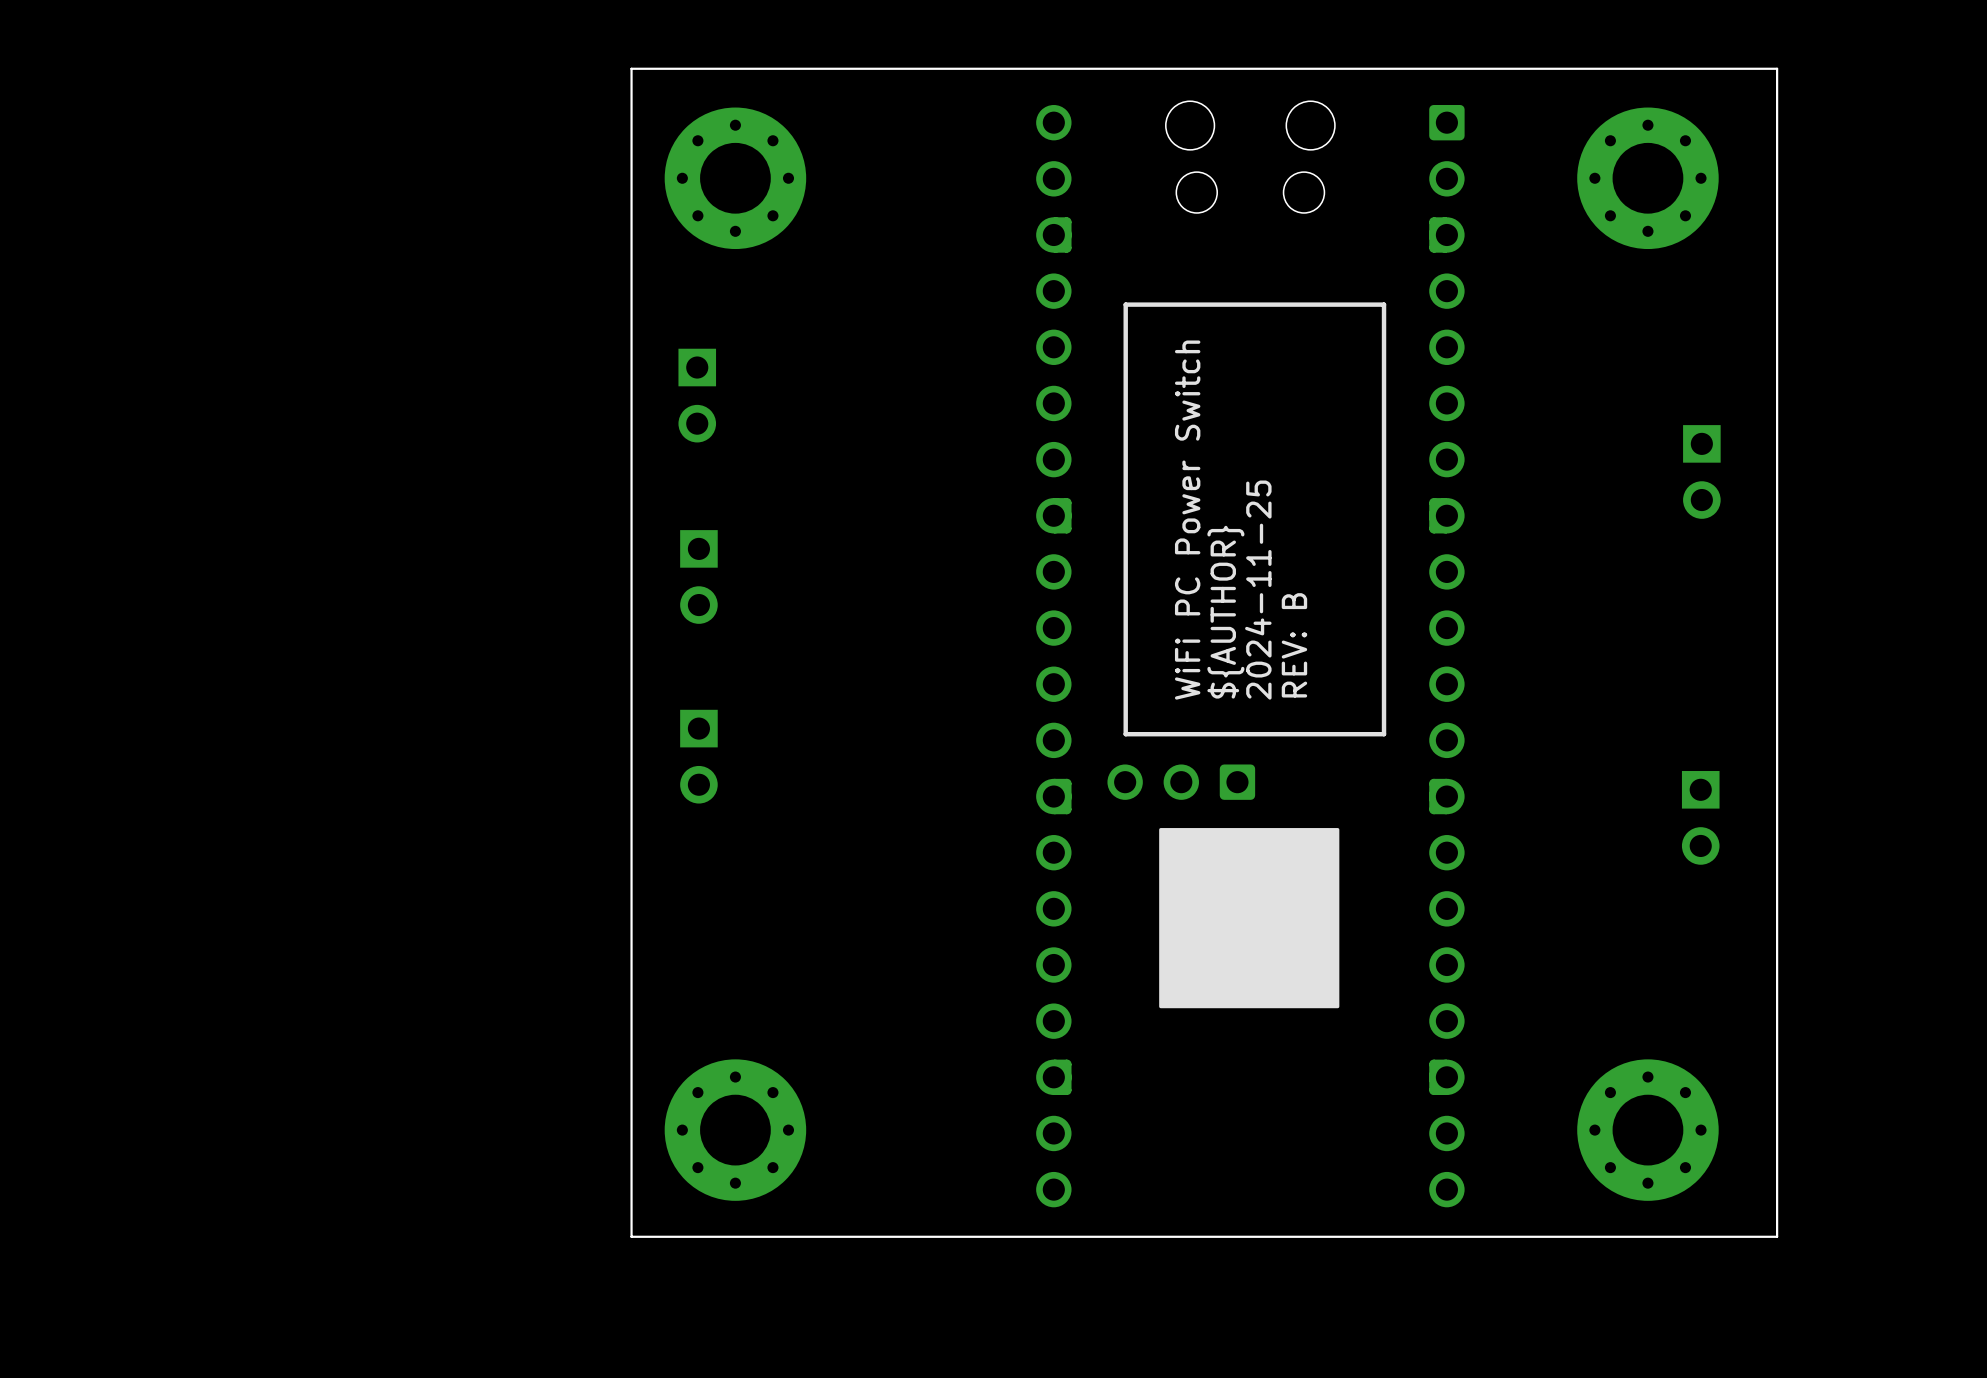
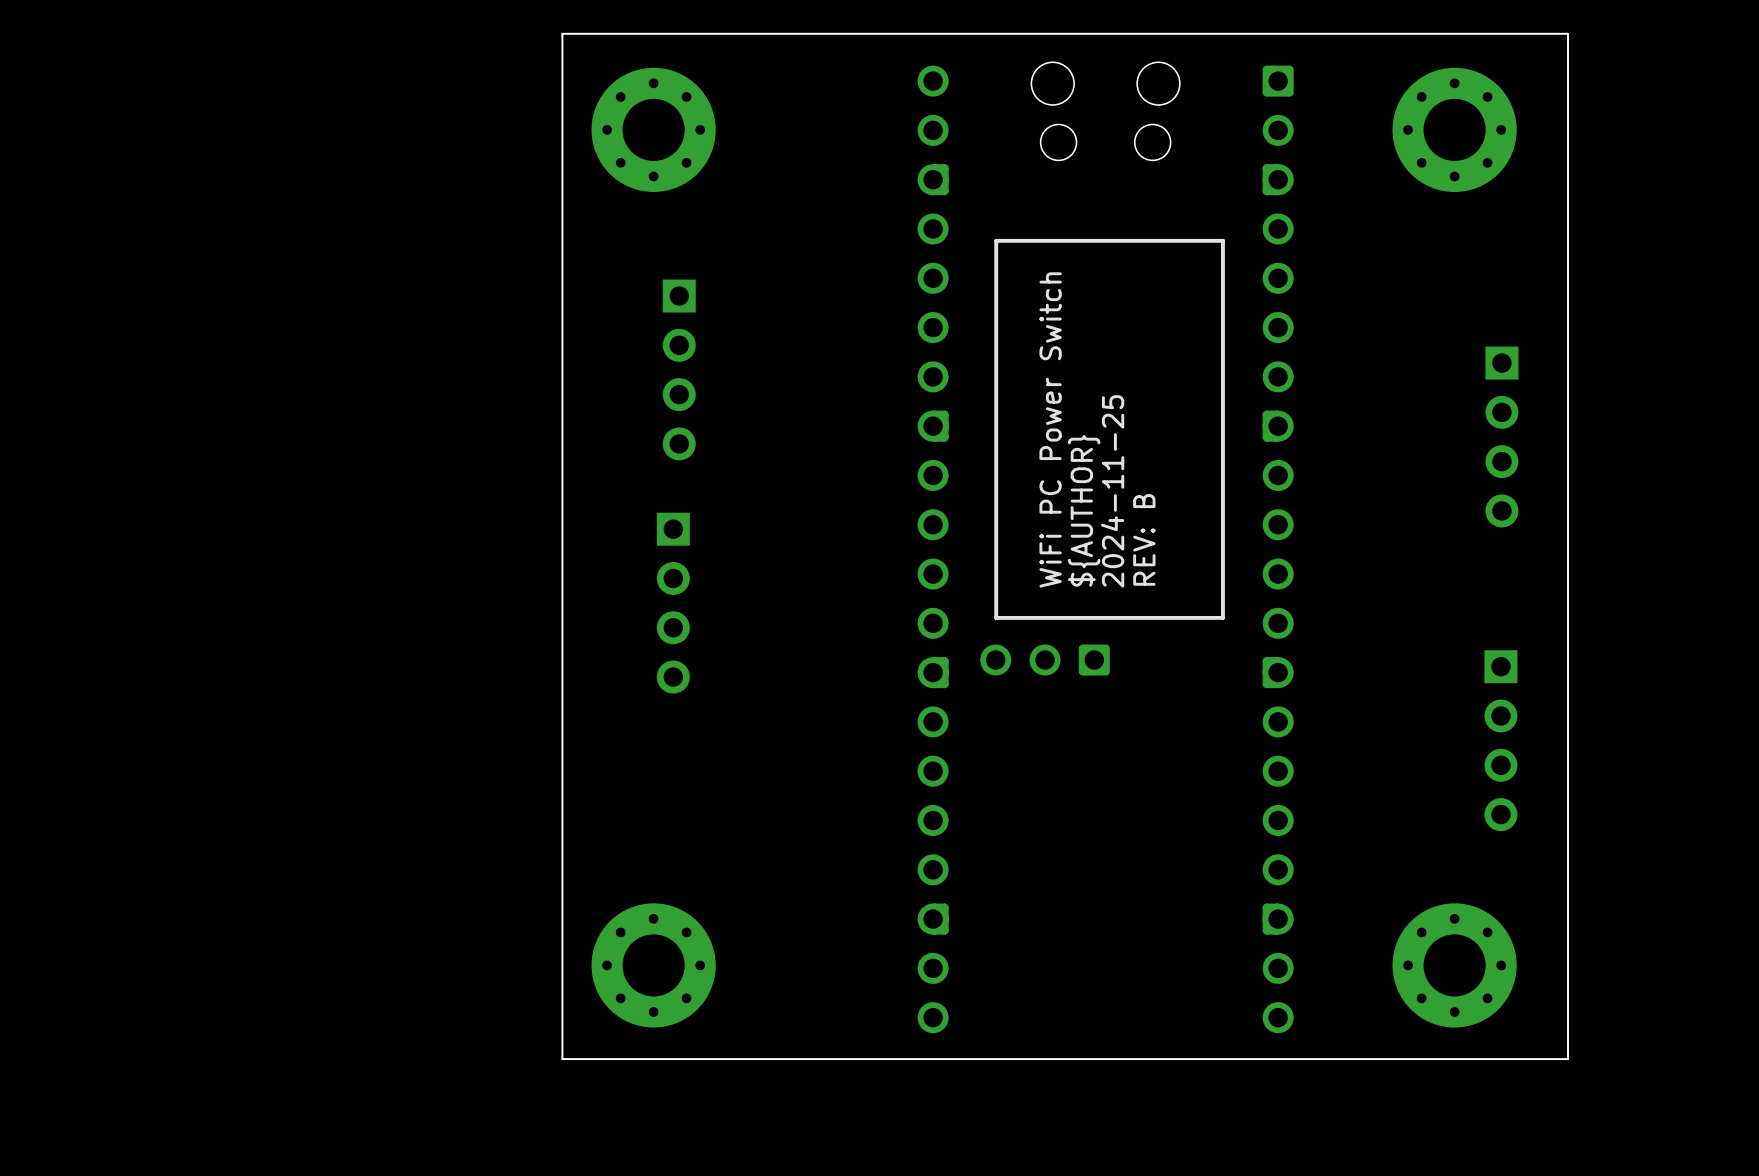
part: (697, 395) -> none
part: none -> (679, 369)
part: none -> (1501, 437)
part: (698, 576) -> none
part: none -> (673, 603)
part: (698, 756) -> none
drawing: [1159, 828, 1340, 1009] -> none
part: none -> (1500, 740)

